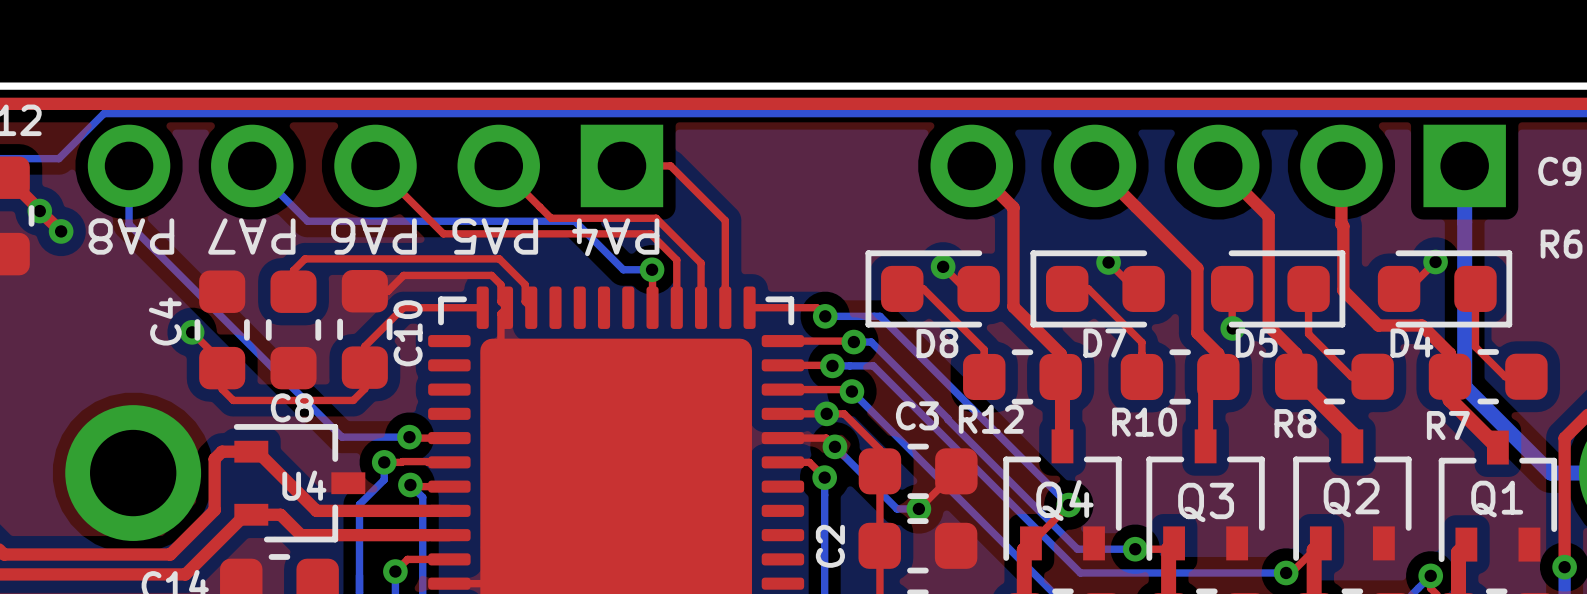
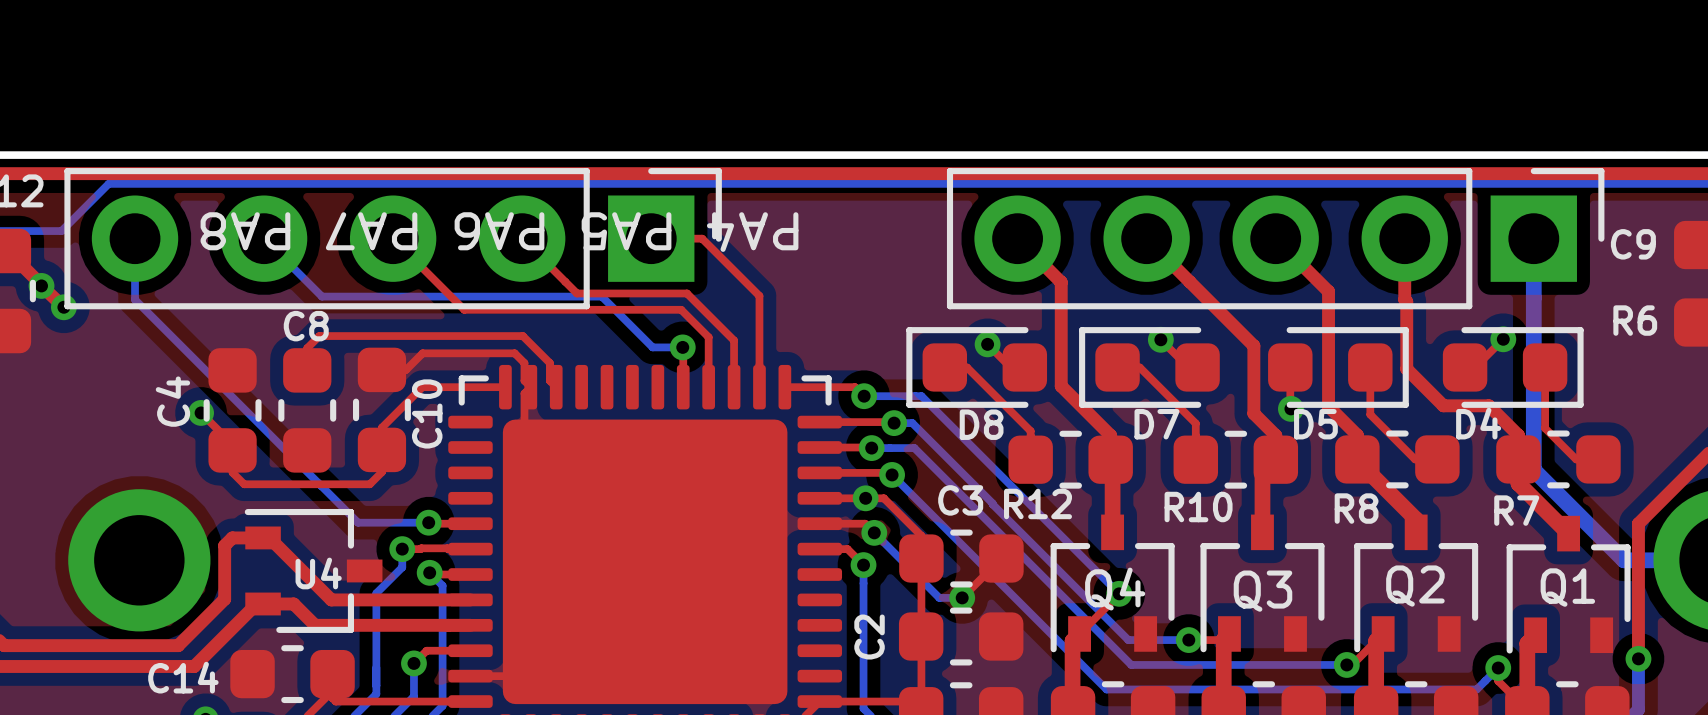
part footprint: [87, 124, 664, 208] -> [64, 168, 722, 310]
part footprint: [930, 124, 1506, 208] -> [946, 168, 1605, 310]
text position: PA4 PA5 PA6 PA7 PA8 (373, 237) -> PA4 PA5 PA6 PA7 PA8 (499, 232)
C8 name position: C8 (292, 407) -> C8 (306, 326)

